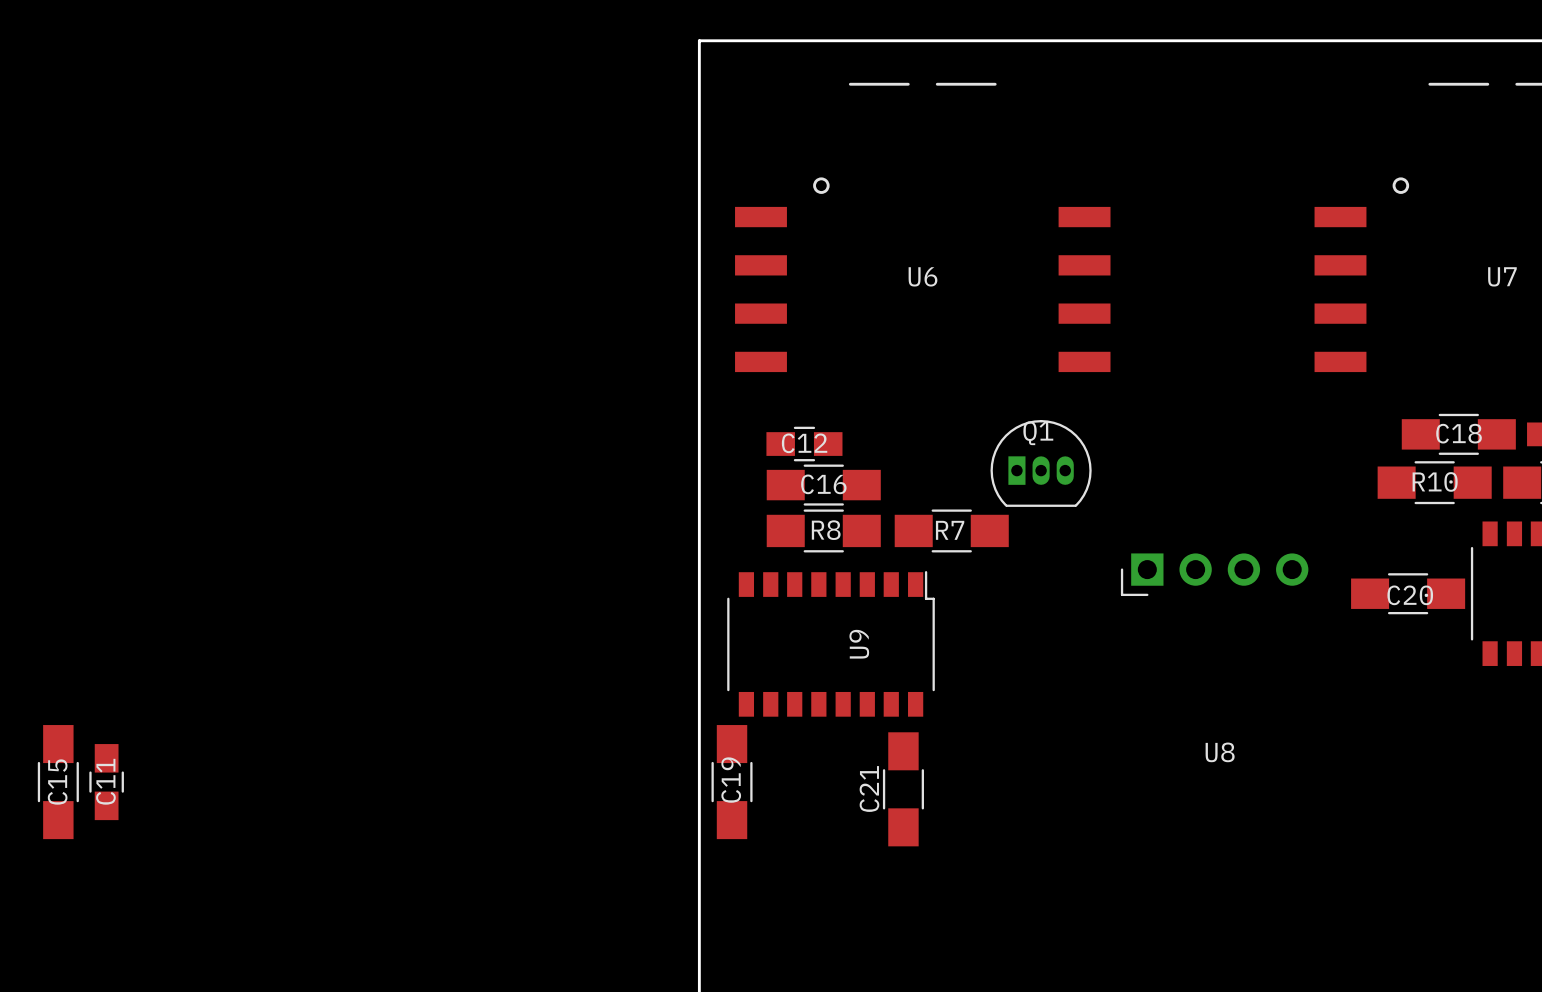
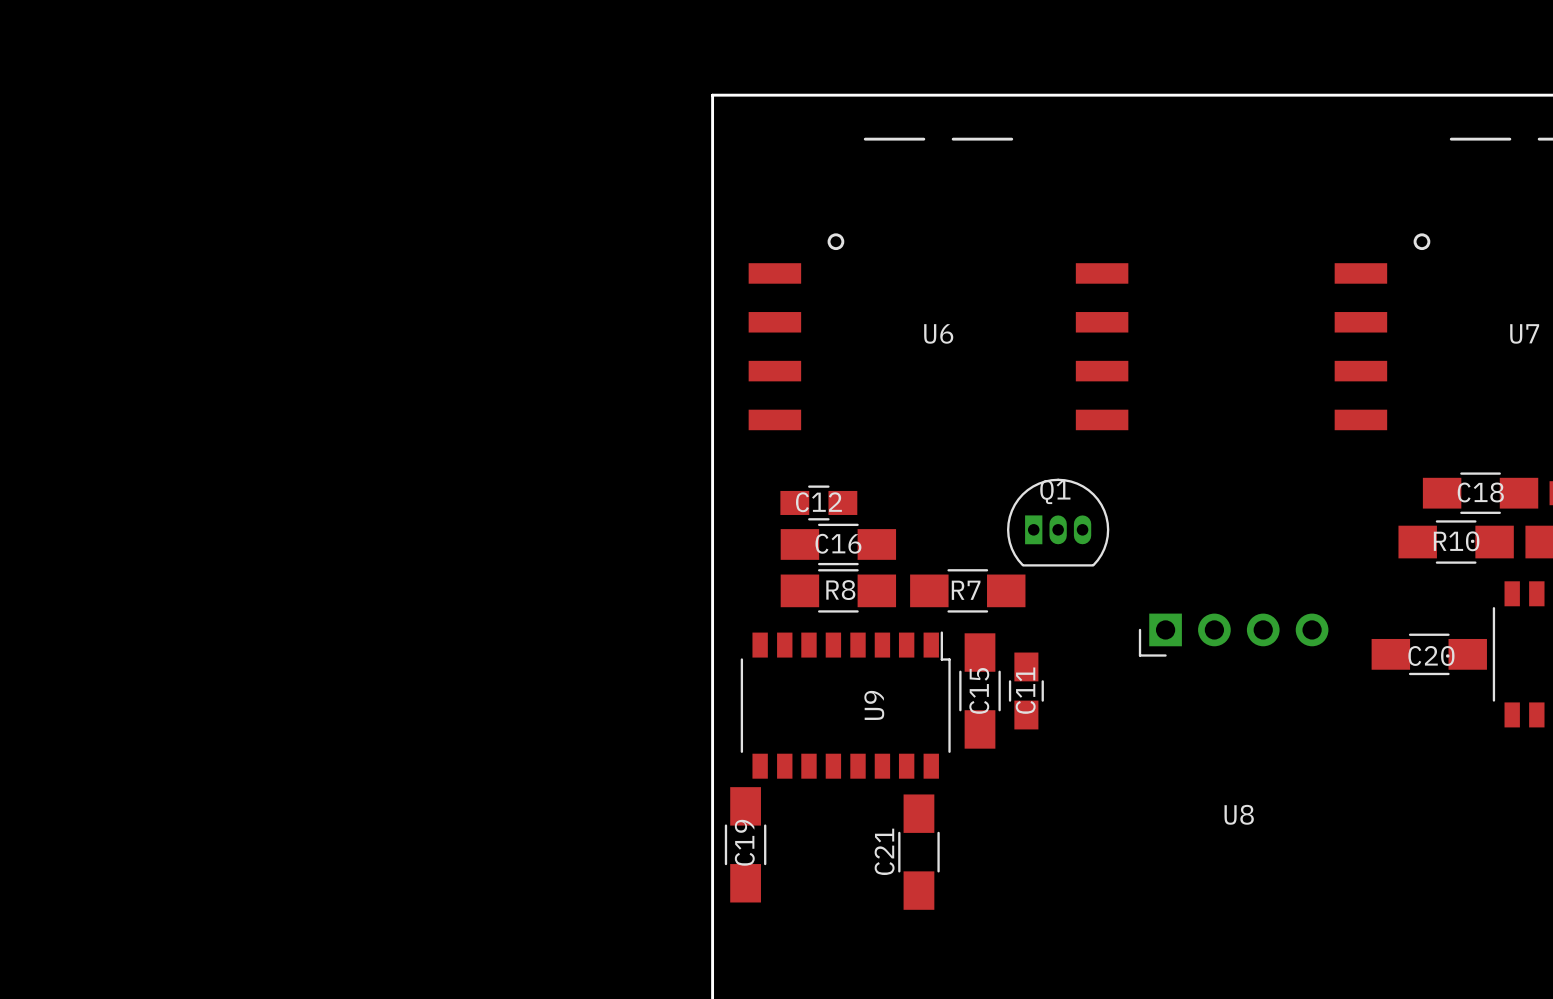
C15 position: (58, 782) -> (980, 690)
C11 position: (106, 782) -> (1026, 690)

